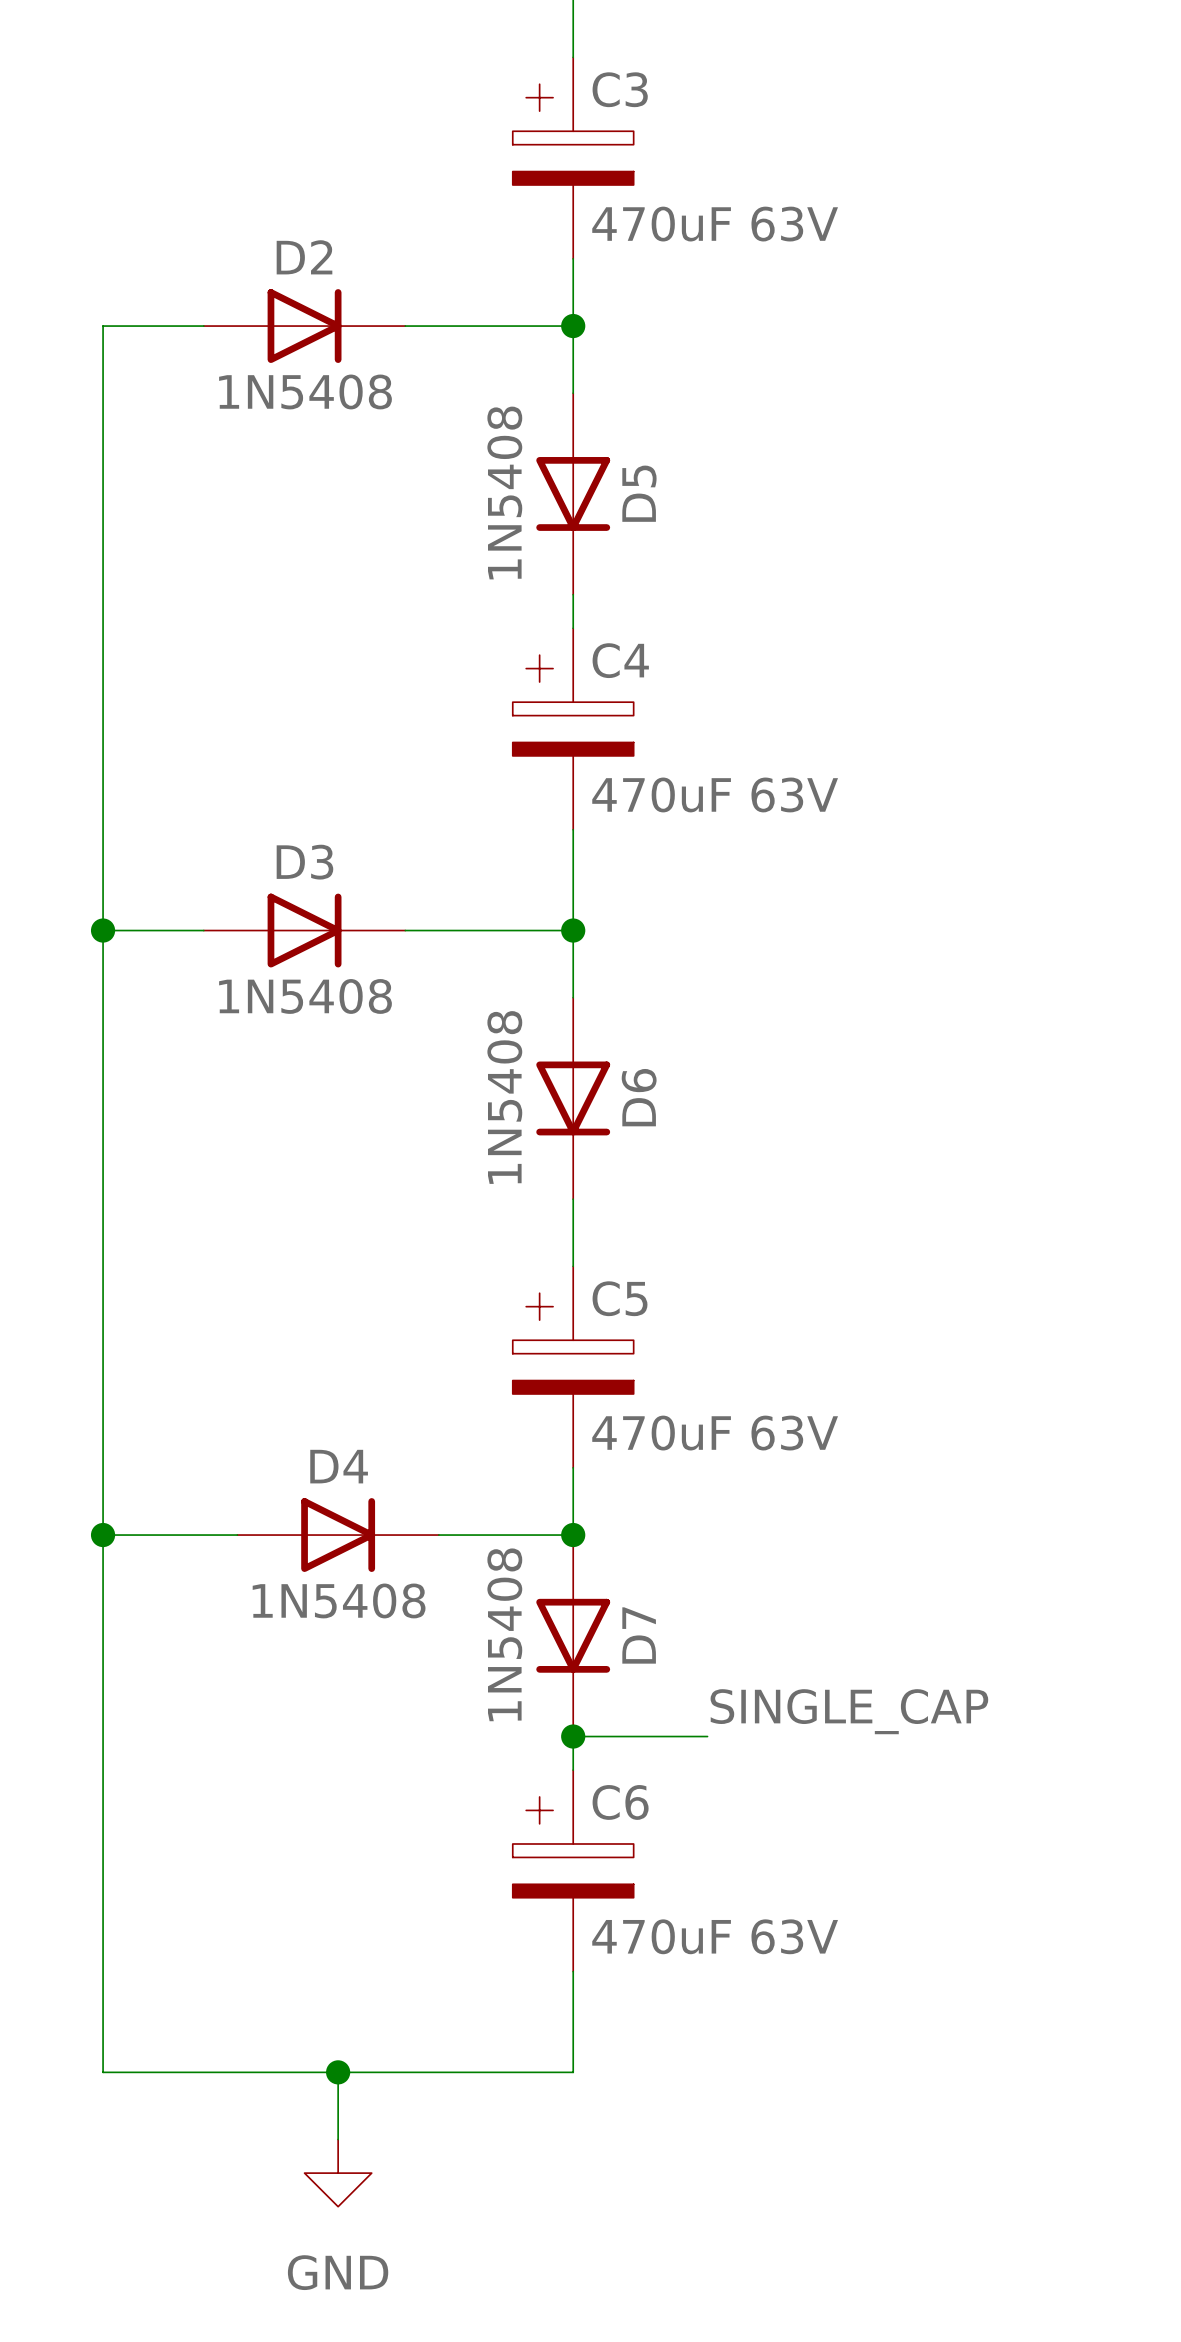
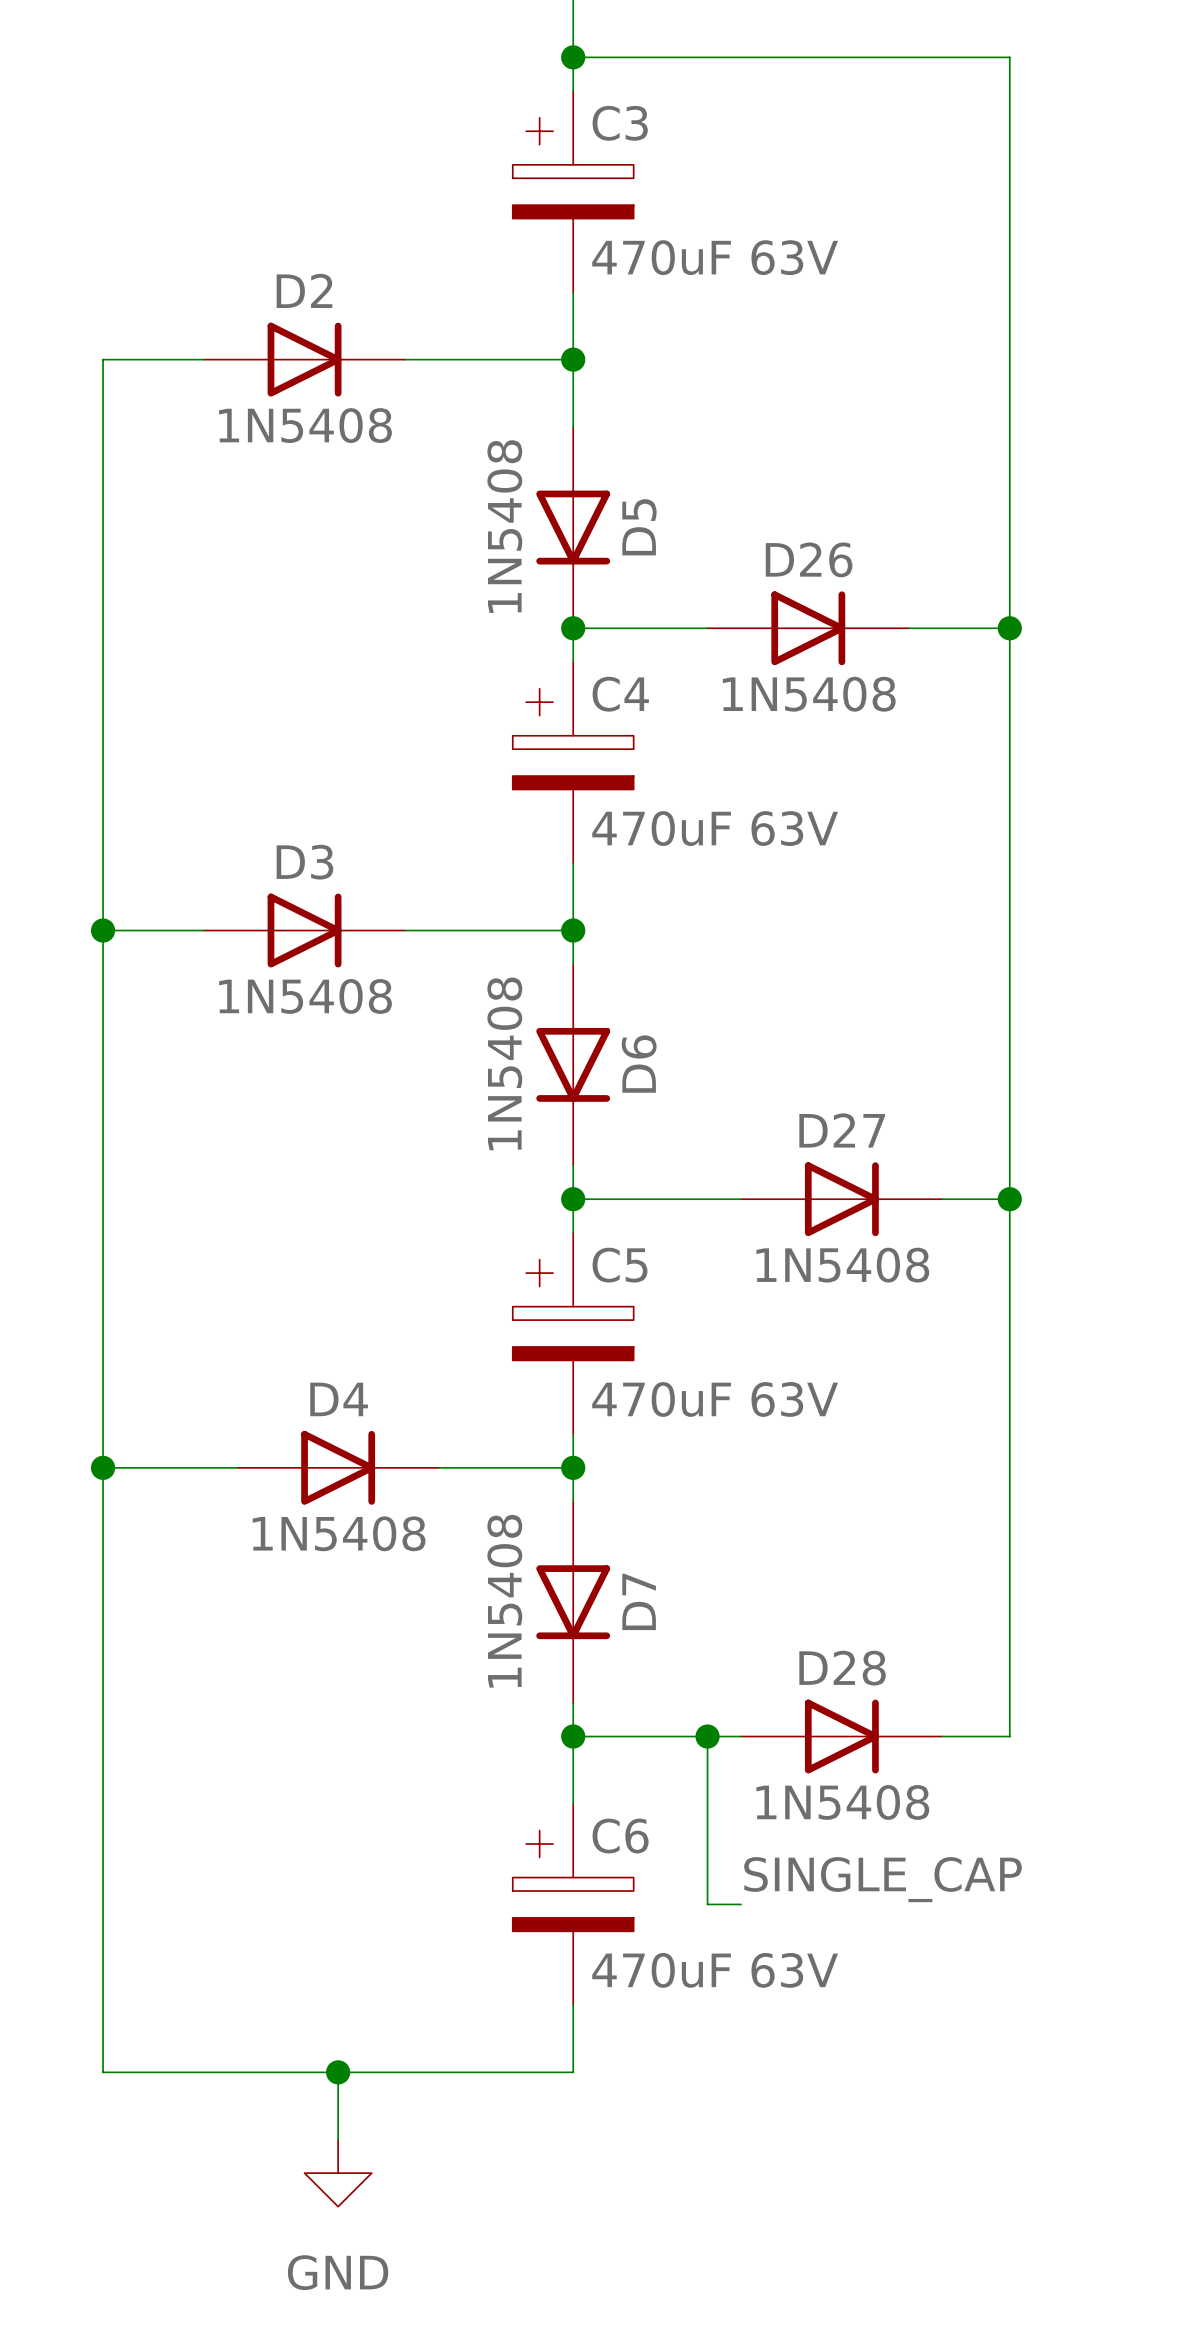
junction: none -> (573, 57)
wire: none -> (573, 90) (573, 57) (1009, 57) (1009, 1736) (942, 1736)
C3 position: (573, 158) -> (573, 191)
wire: (203, 326) (103, 326) (103, 359) -> (203, 359) (103, 359)
D2 position: (304, 326) -> (304, 359)
wire: (405, 326) (573, 326) -> (405, 359) (573, 359)
junction position: (573, 326) -> (573, 359)
D5 position: (573, 493) -> (573, 527)
junction: none -> (573, 628)
wire: none -> (707, 628) (573, 628) (573, 661)
D26: none -> 1N5408 (808, 628)
wire: none -> (909, 628) (1009, 628)
junction: none -> (1009, 628)
C4 position: (573, 729) -> (573, 762)
D6 position: (573, 1098) -> (573, 1064)
wire: none -> (573, 1165) (573, 1199) (741, 1199)
junction: none -> (573, 1199)
D27: none -> 1N5408 (841, 1199)
wire: none -> (942, 1199) (1009, 1199)
junction: none -> (1009, 1199)
C5 position: (573, 1367) -> (573, 1333)
wire: (573, 1501) (573, 1535) (438, 1535) -> (573, 1434) (573, 1467) (438, 1467)
wire: (103, 1535) (237, 1535) -> (103, 1467) (237, 1467)
junction position: (103, 1535) -> (103, 1467)
D4 position: (338, 1535) -> (338, 1467)
junction position: (573, 1535) -> (573, 1467)
D7 position: (573, 1635) -> (573, 1602)
label position: SINGLE_CAP (849, 1711) -> SINGLE_CAP (882, 1879)
junction: none -> (707, 1736)
wire: none -> (741, 1736) (707, 1736) (707, 1904) (741, 1904)
D28: none -> 1N5408 (841, 1736)
C6 position: (573, 1870) -> (573, 1904)

